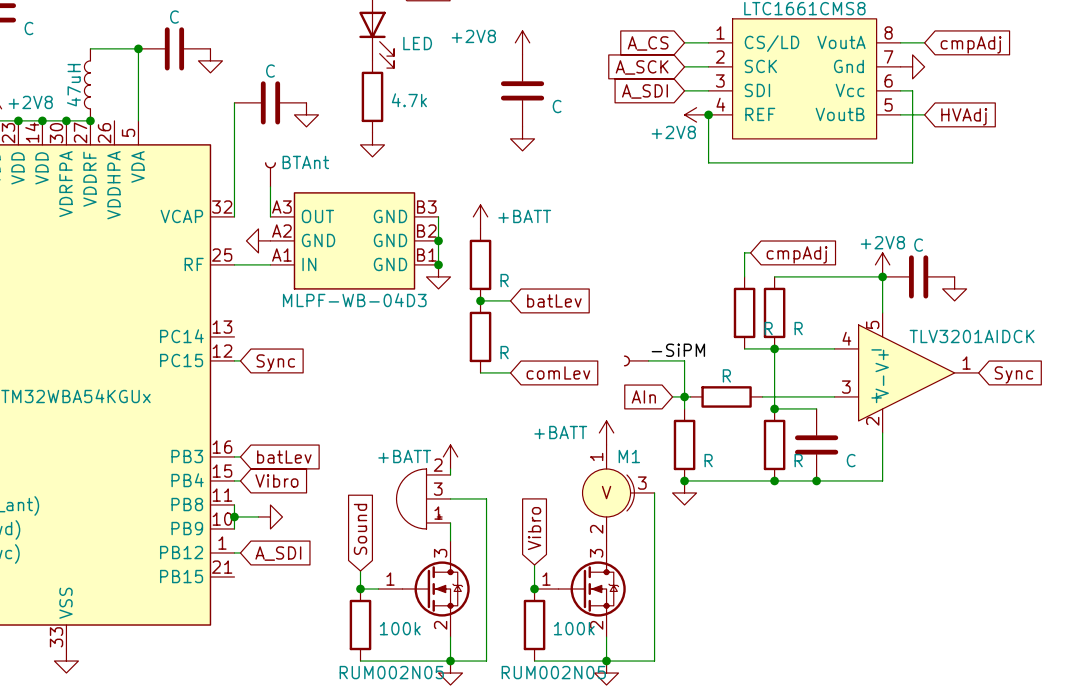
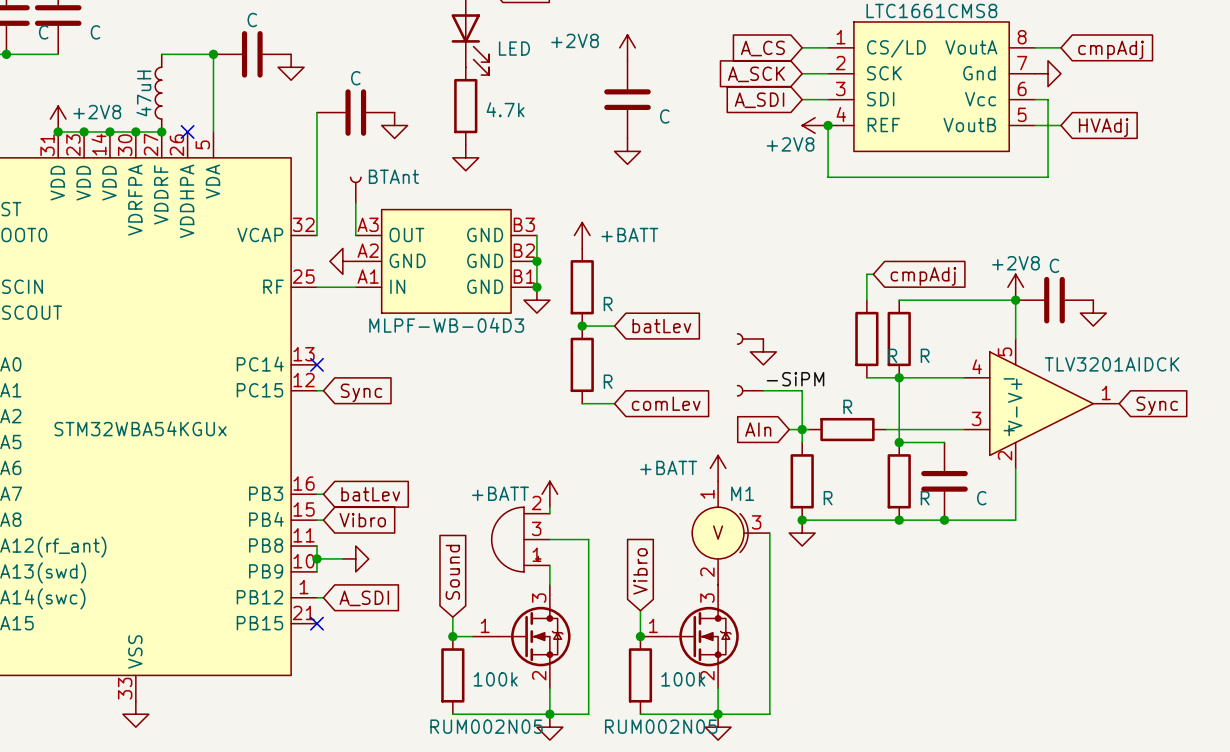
no-connect mark: none -> (187, 131)
part: none -> (750, 339)
power symbol: none -> (763, 351)
no-connect mark: none -> (316, 364)
no-connect mark: none -> (316, 623)

